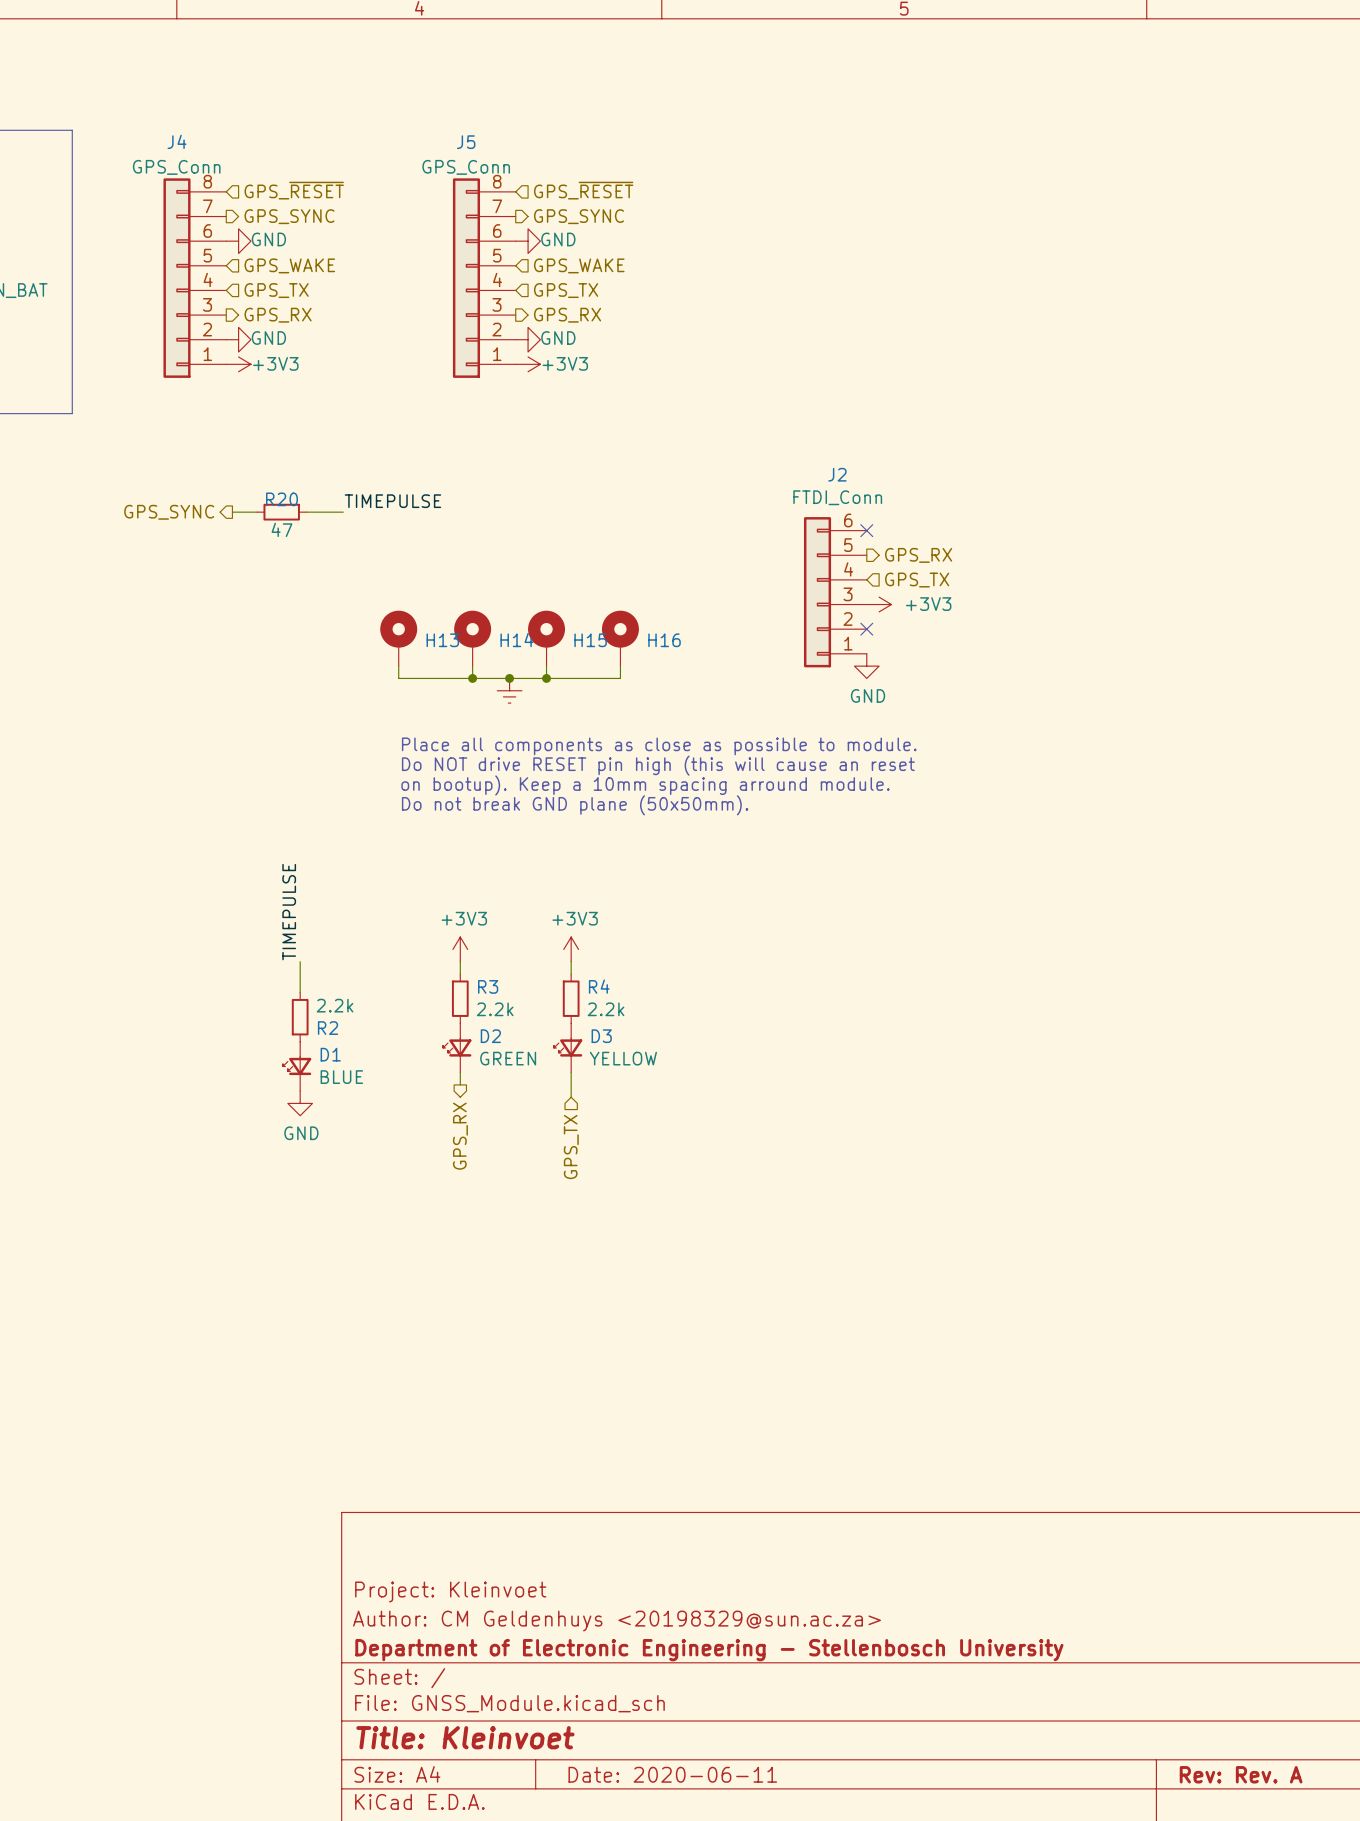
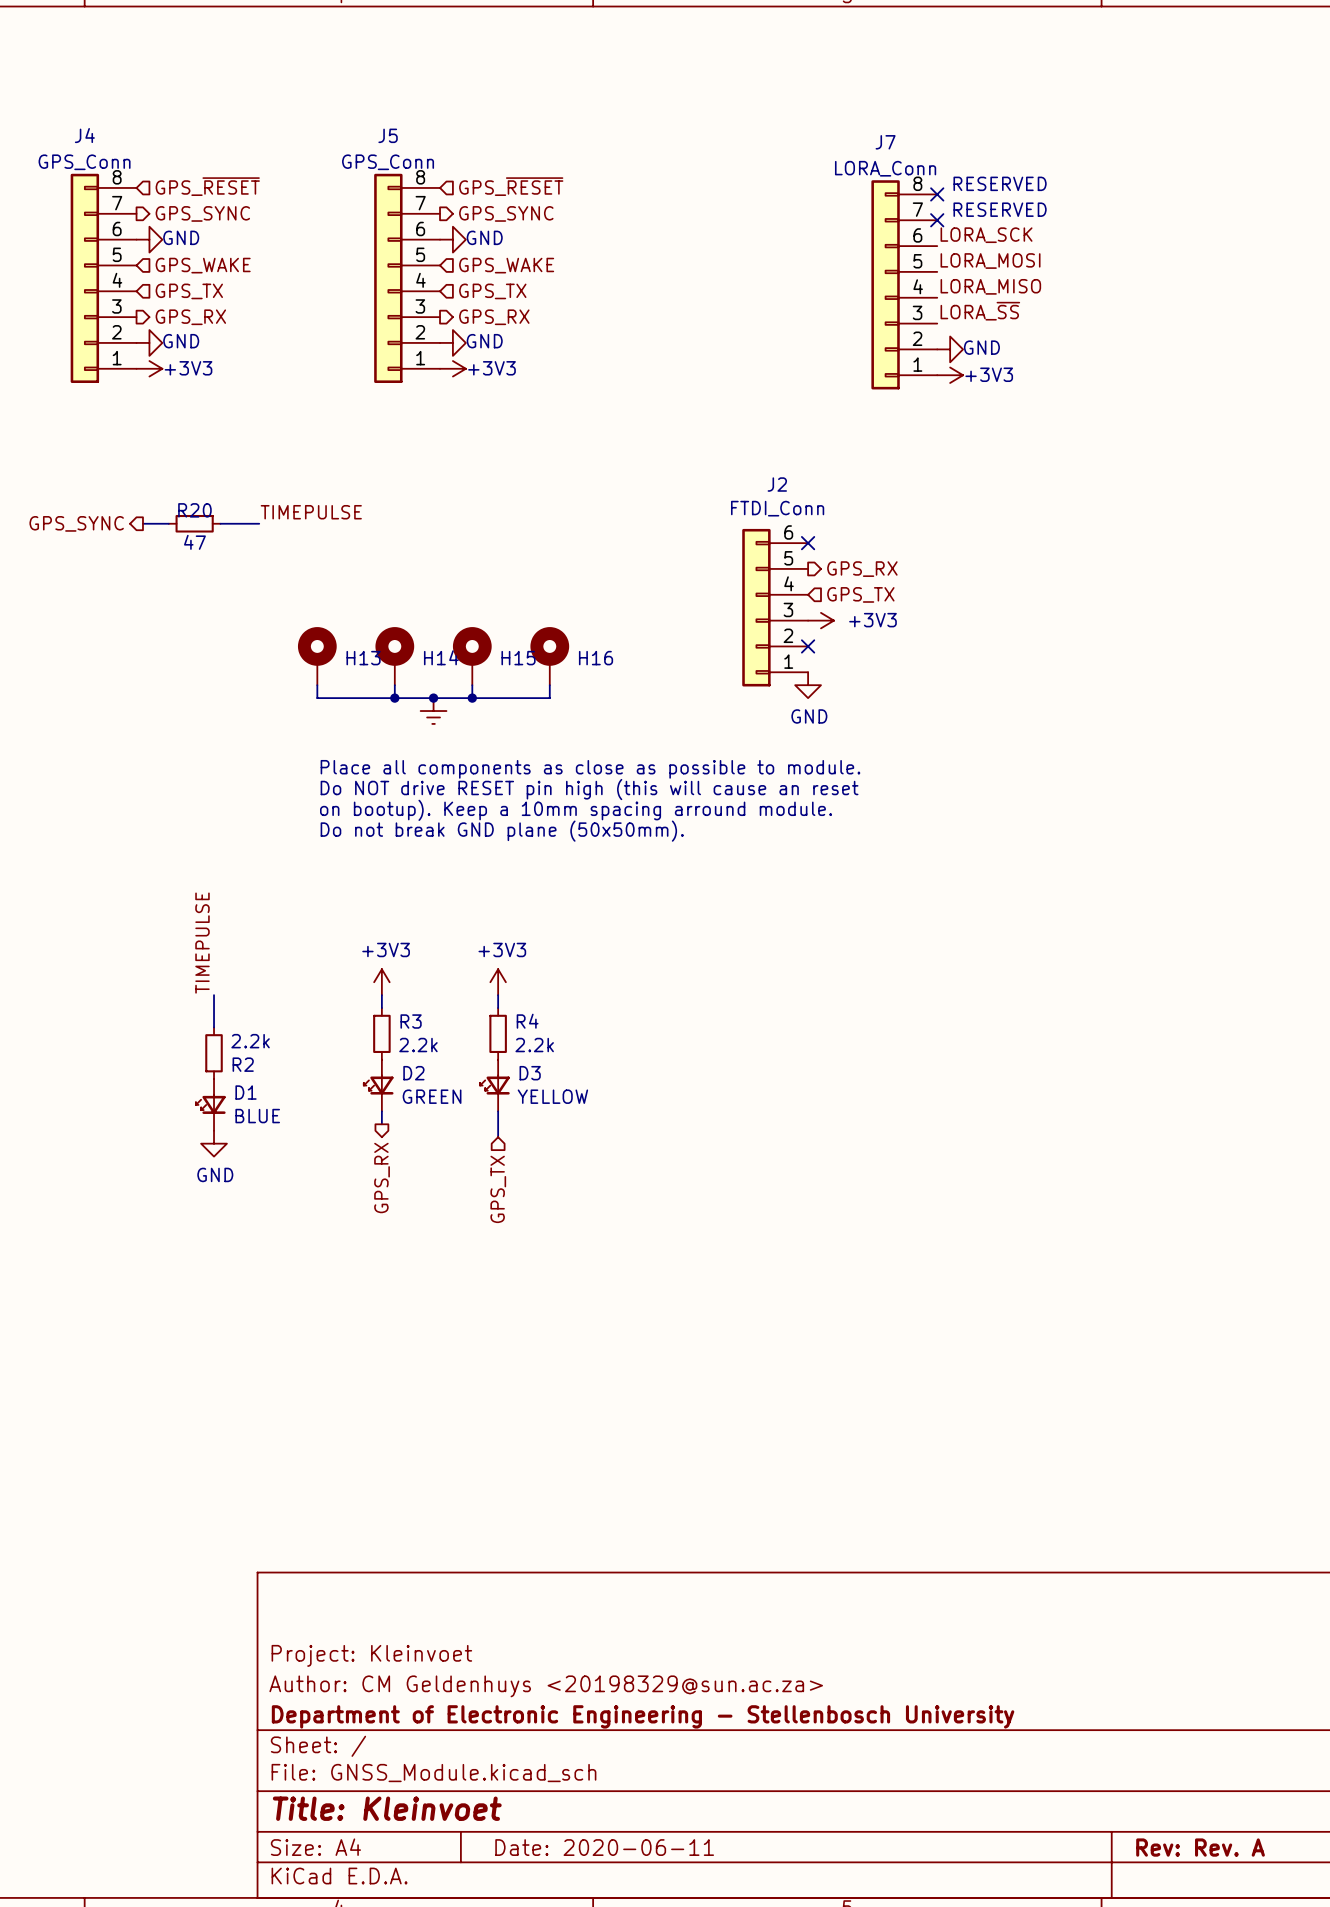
text: none -> RESERVED (1000, 183)
no-connect mark: none -> (937, 194)
text: none -> RESERVED (1000, 209)
no-connect mark: none -> (937, 220)
label: none -> LORA_SCK (986, 235)
label: none -> LORA_MOSI (990, 261)
J7: none -> LORA_Conn (904, 284)
label: none -> LORA_MISO (990, 286)
label: none -> LORA_~{SS} (980, 311)
power symbol: none -> GND (950, 349)
power symbol: none -> +3V3 (950, 375)

